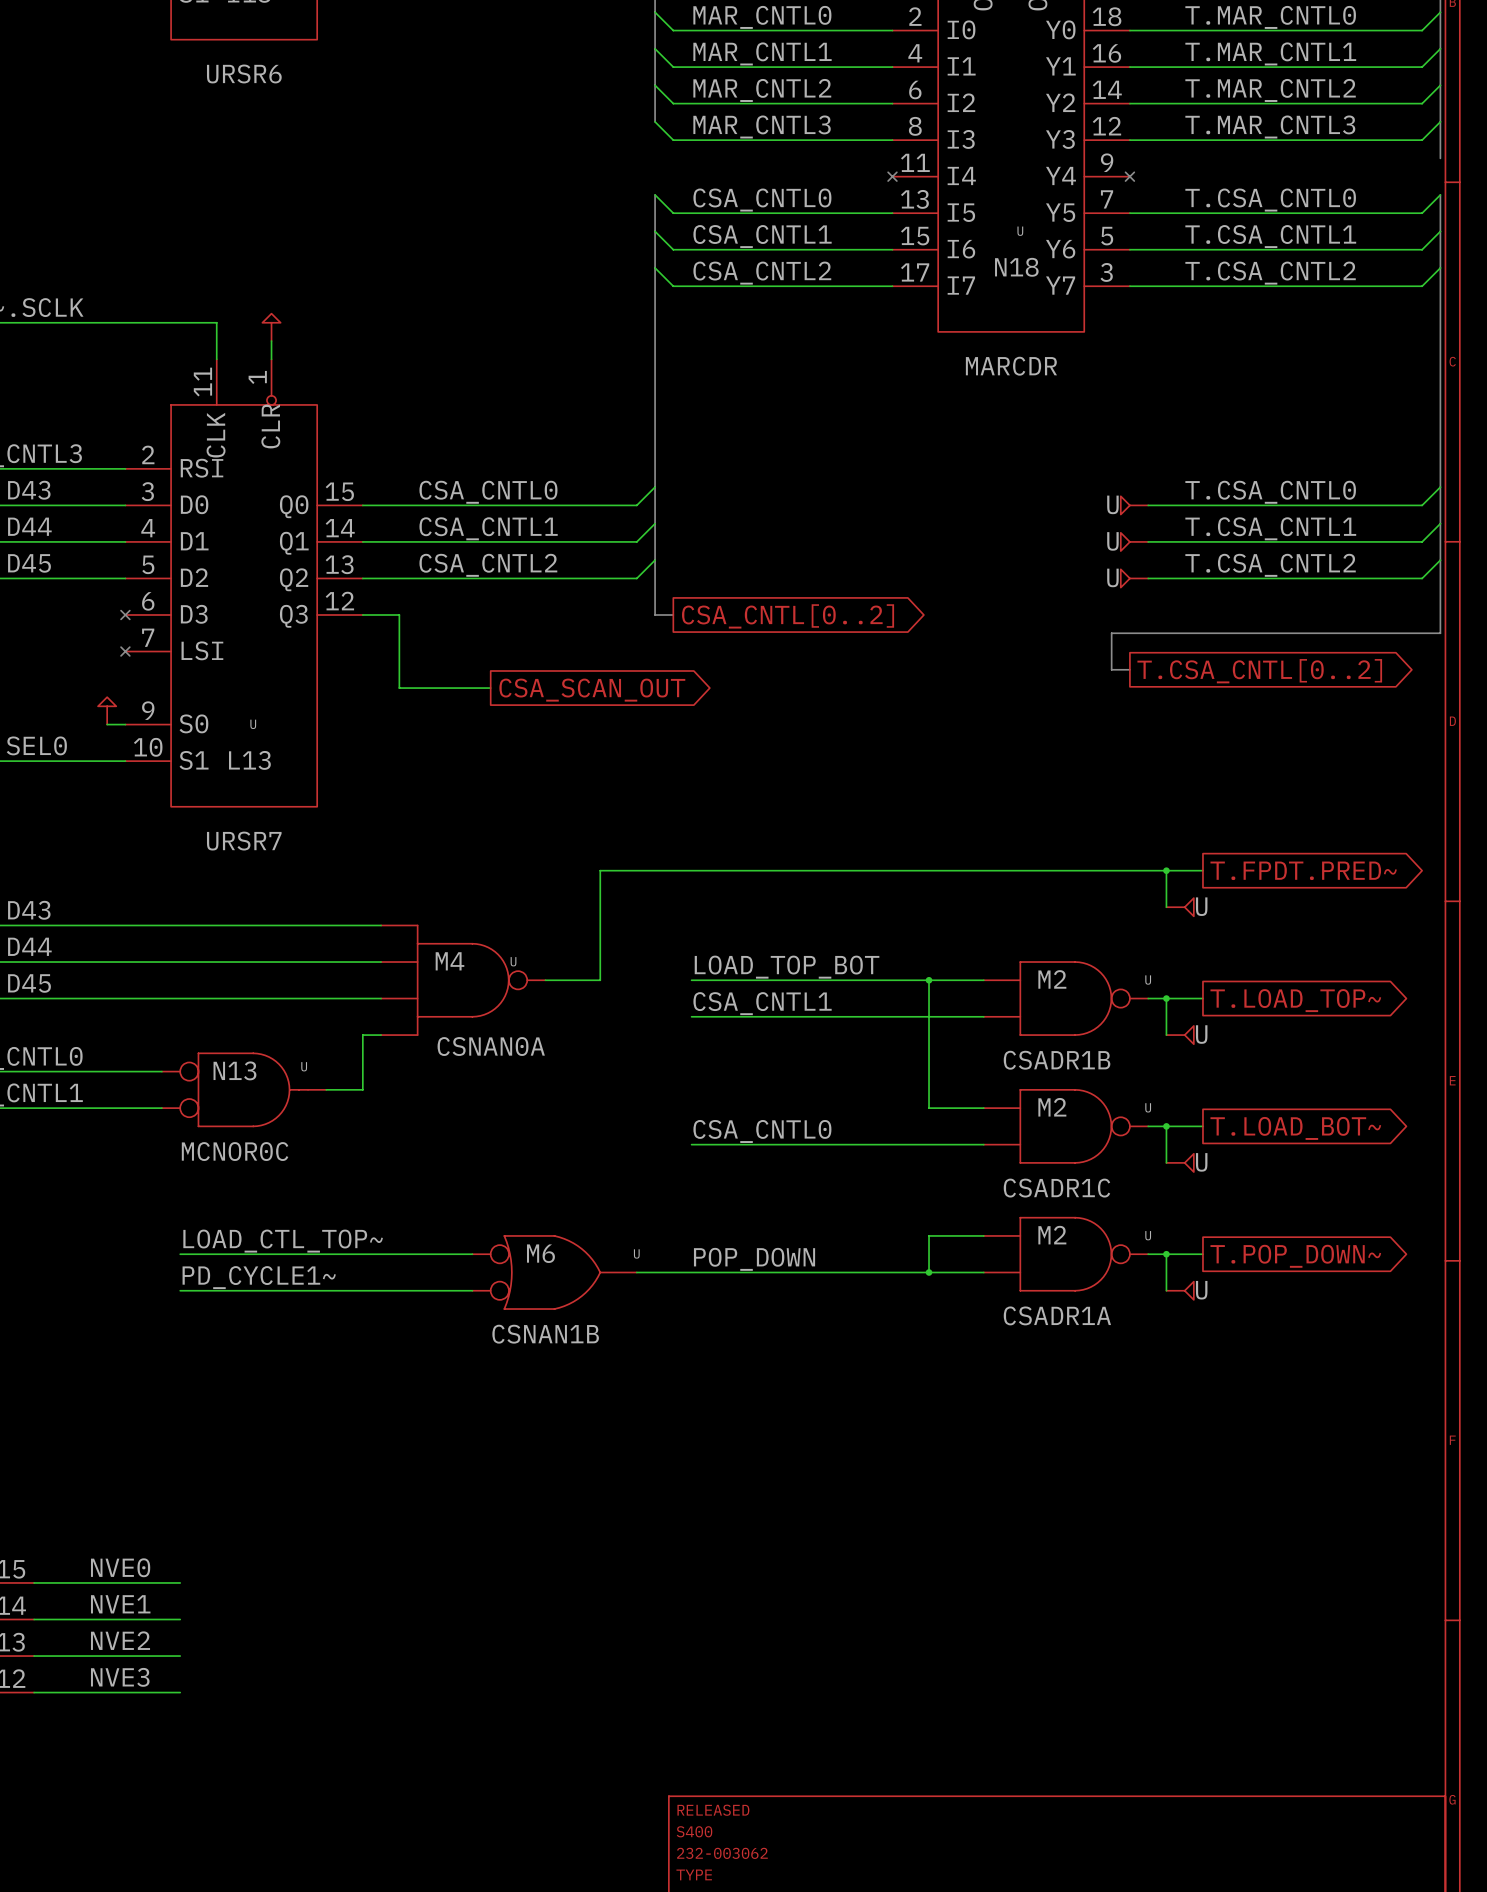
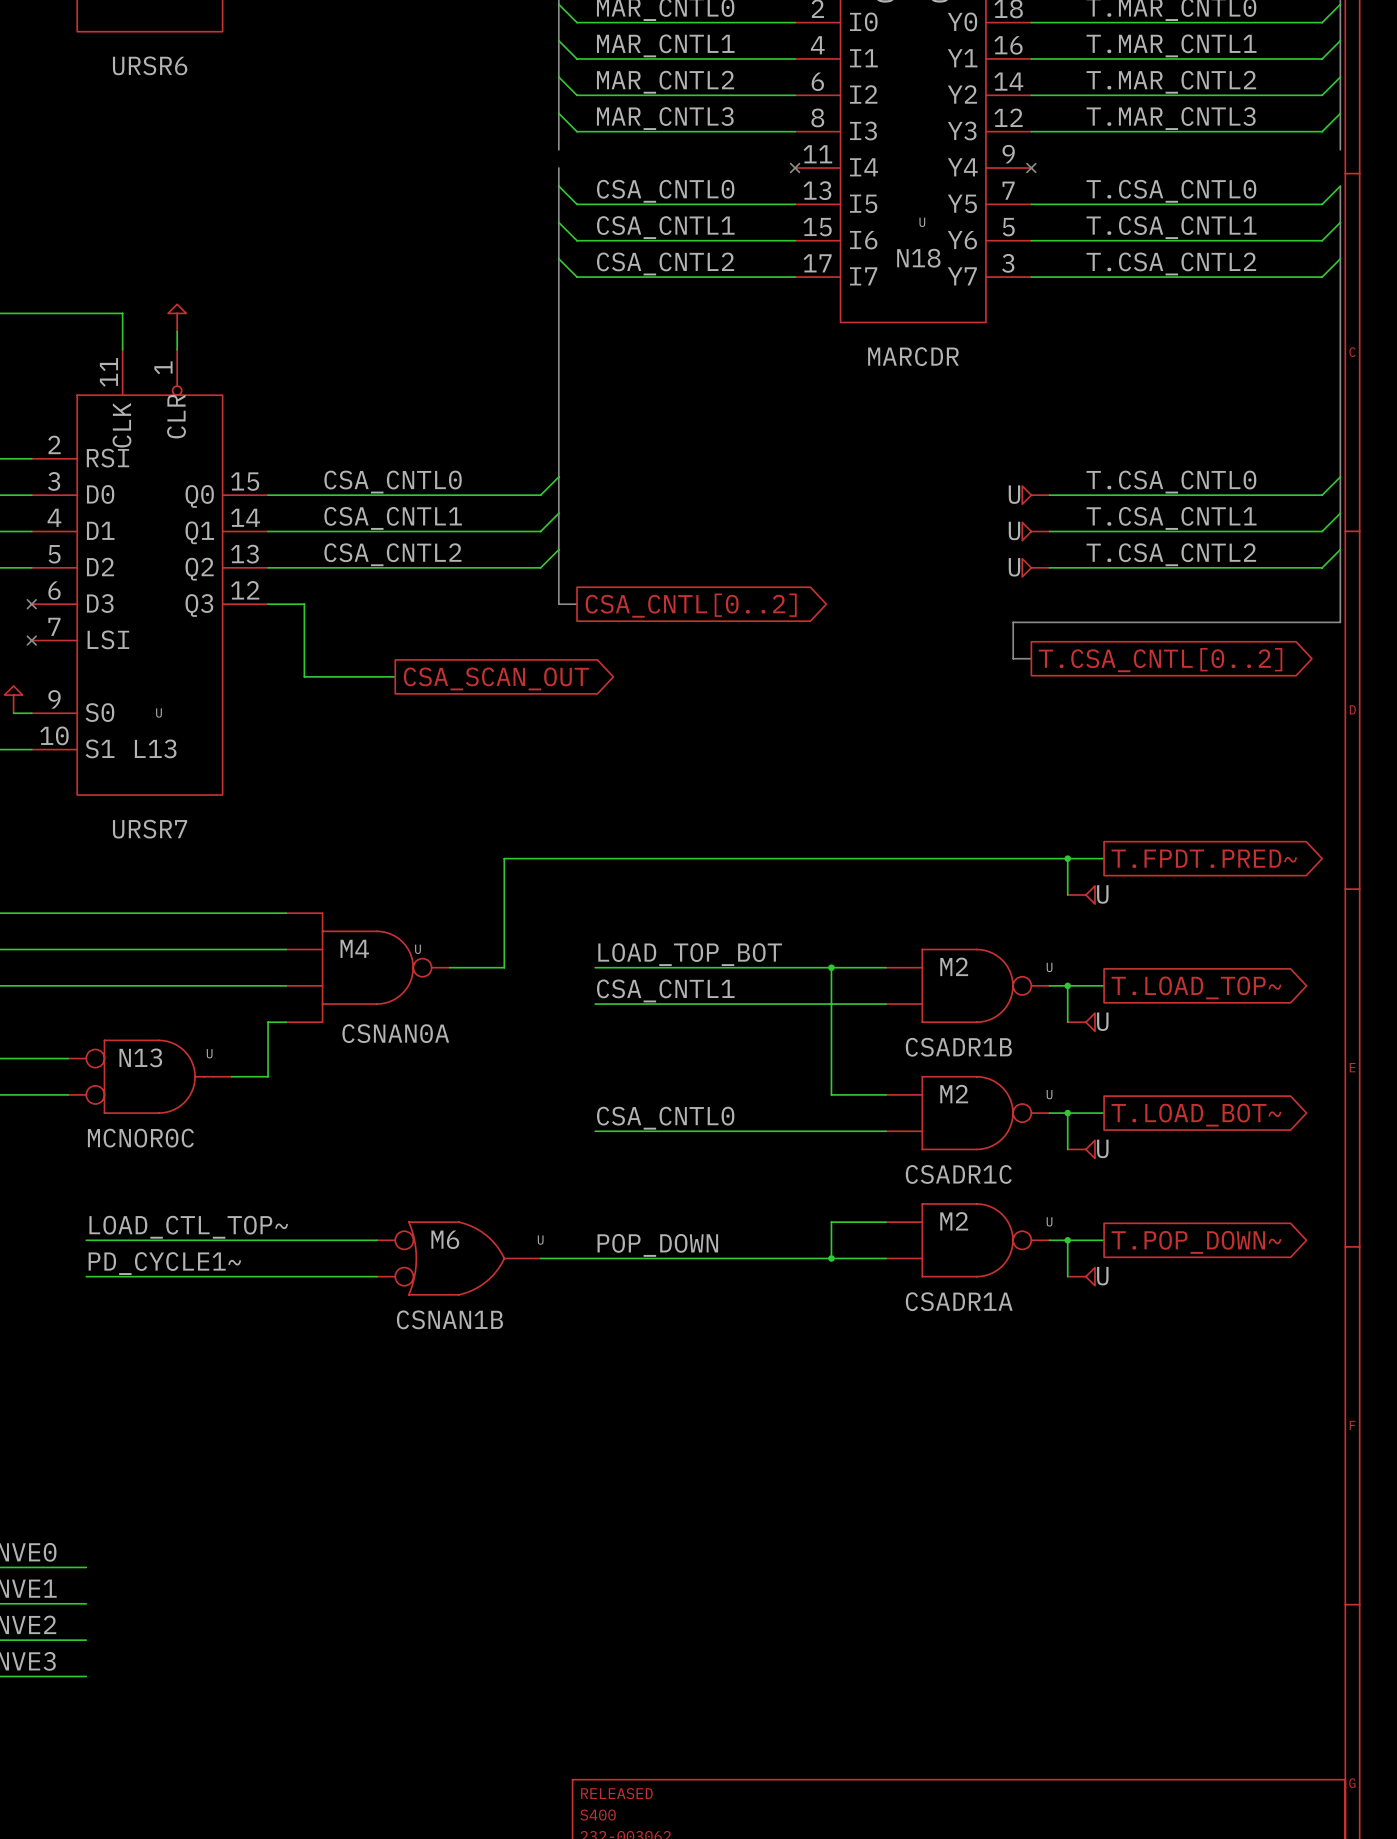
bus: none -> (558, 113) (558, 149)
bus: none -> (558, 168) (558, 186)

